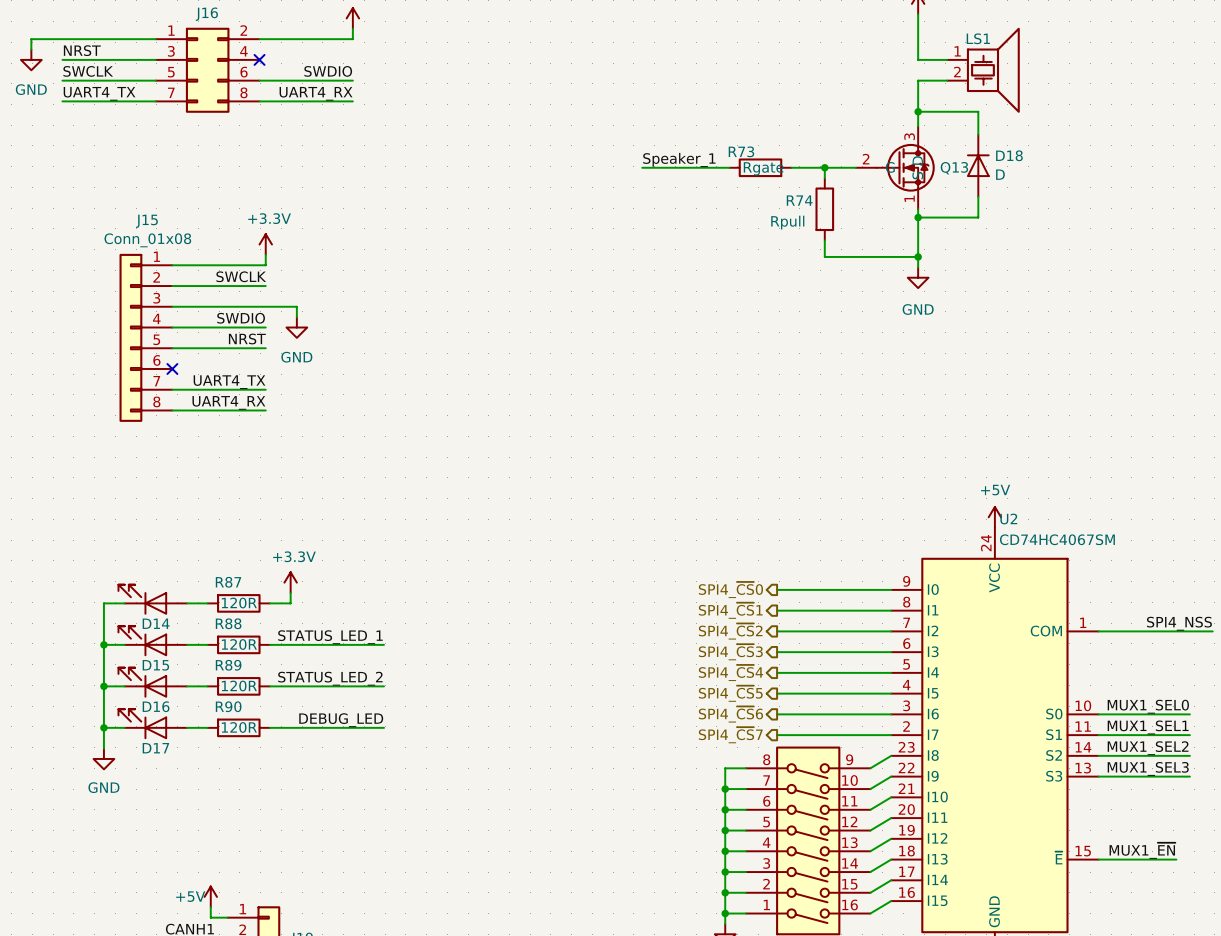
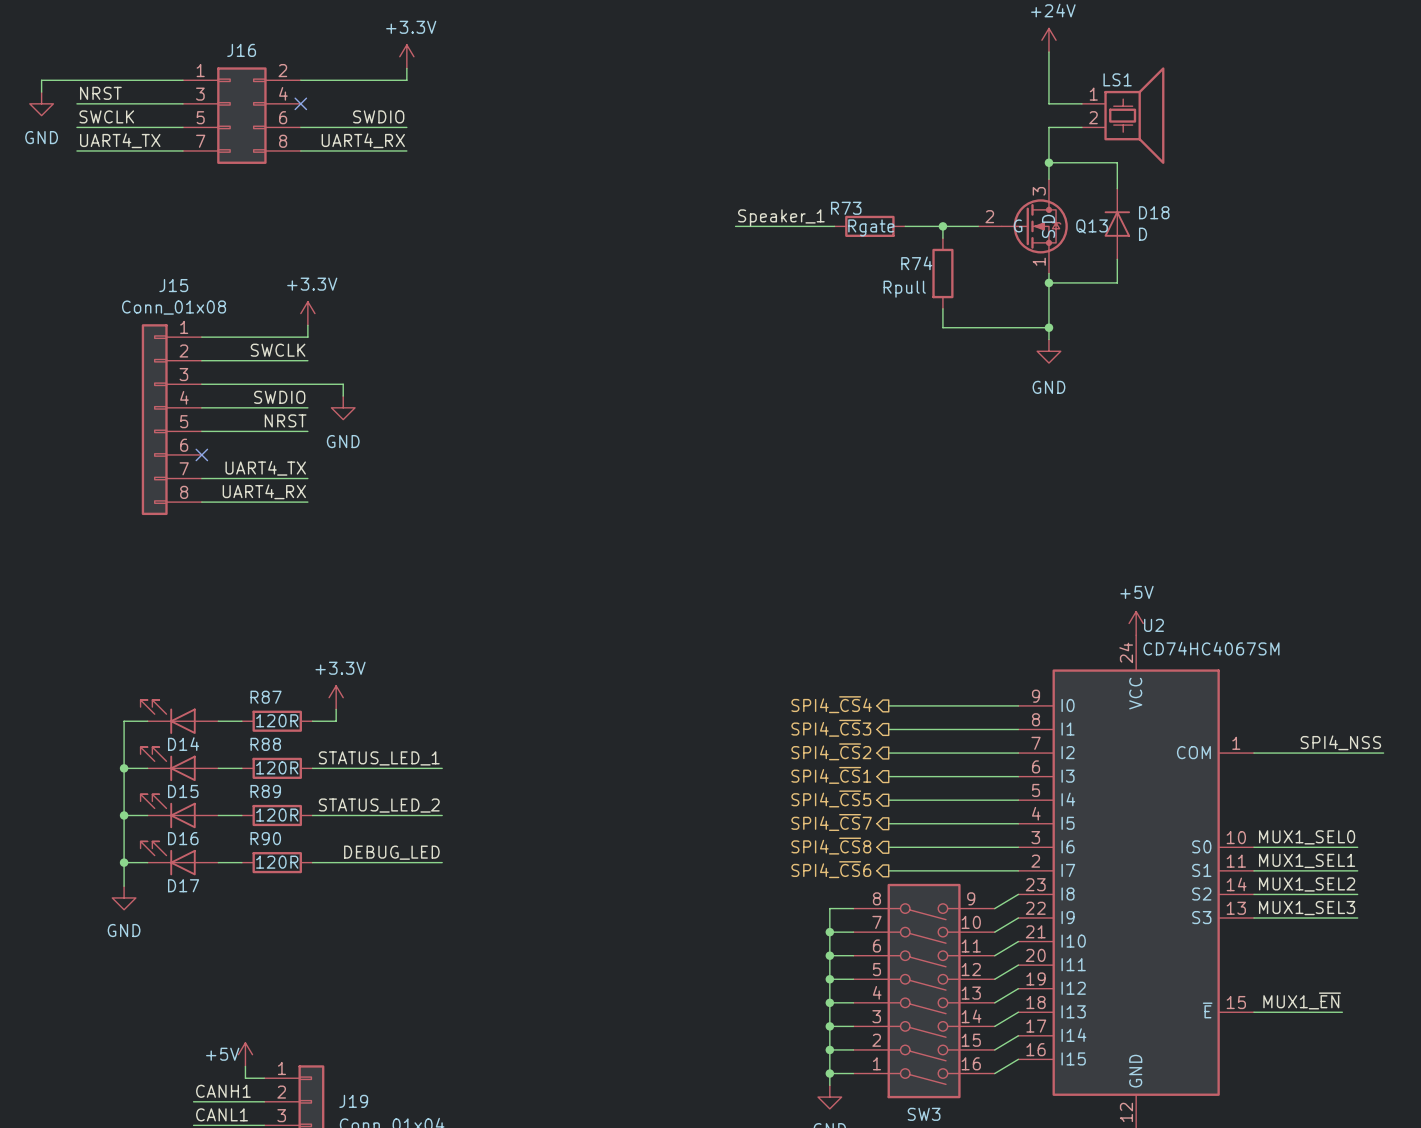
hierarchical label: SPI4_~{CS}0 (730, 590) -> SPI4_~{CS}4 (831, 704)
hierarchical label: SPI4_~{CS}1 (730, 610) -> SPI4_~{CS}3 (831, 728)
hierarchical label: SPI4_~{CS}3 (730, 652) -> SPI4_~{CS}1 (831, 775)
hierarchical label: SPI4_~{CS}4 (731, 672) -> SPI4_~{CS}5 (831, 798)
hierarchical label: SPI4_~{CS}5 (730, 693) -> SPI4_~{CS}7 (831, 822)
hierarchical label: SPI4_~{CS}6 (730, 714) -> SPI4_~{CS}8 (831, 846)
hierarchical label: SPI4_~{CS}7 (730, 735) -> SPI4_~{CS}6 (831, 869)

